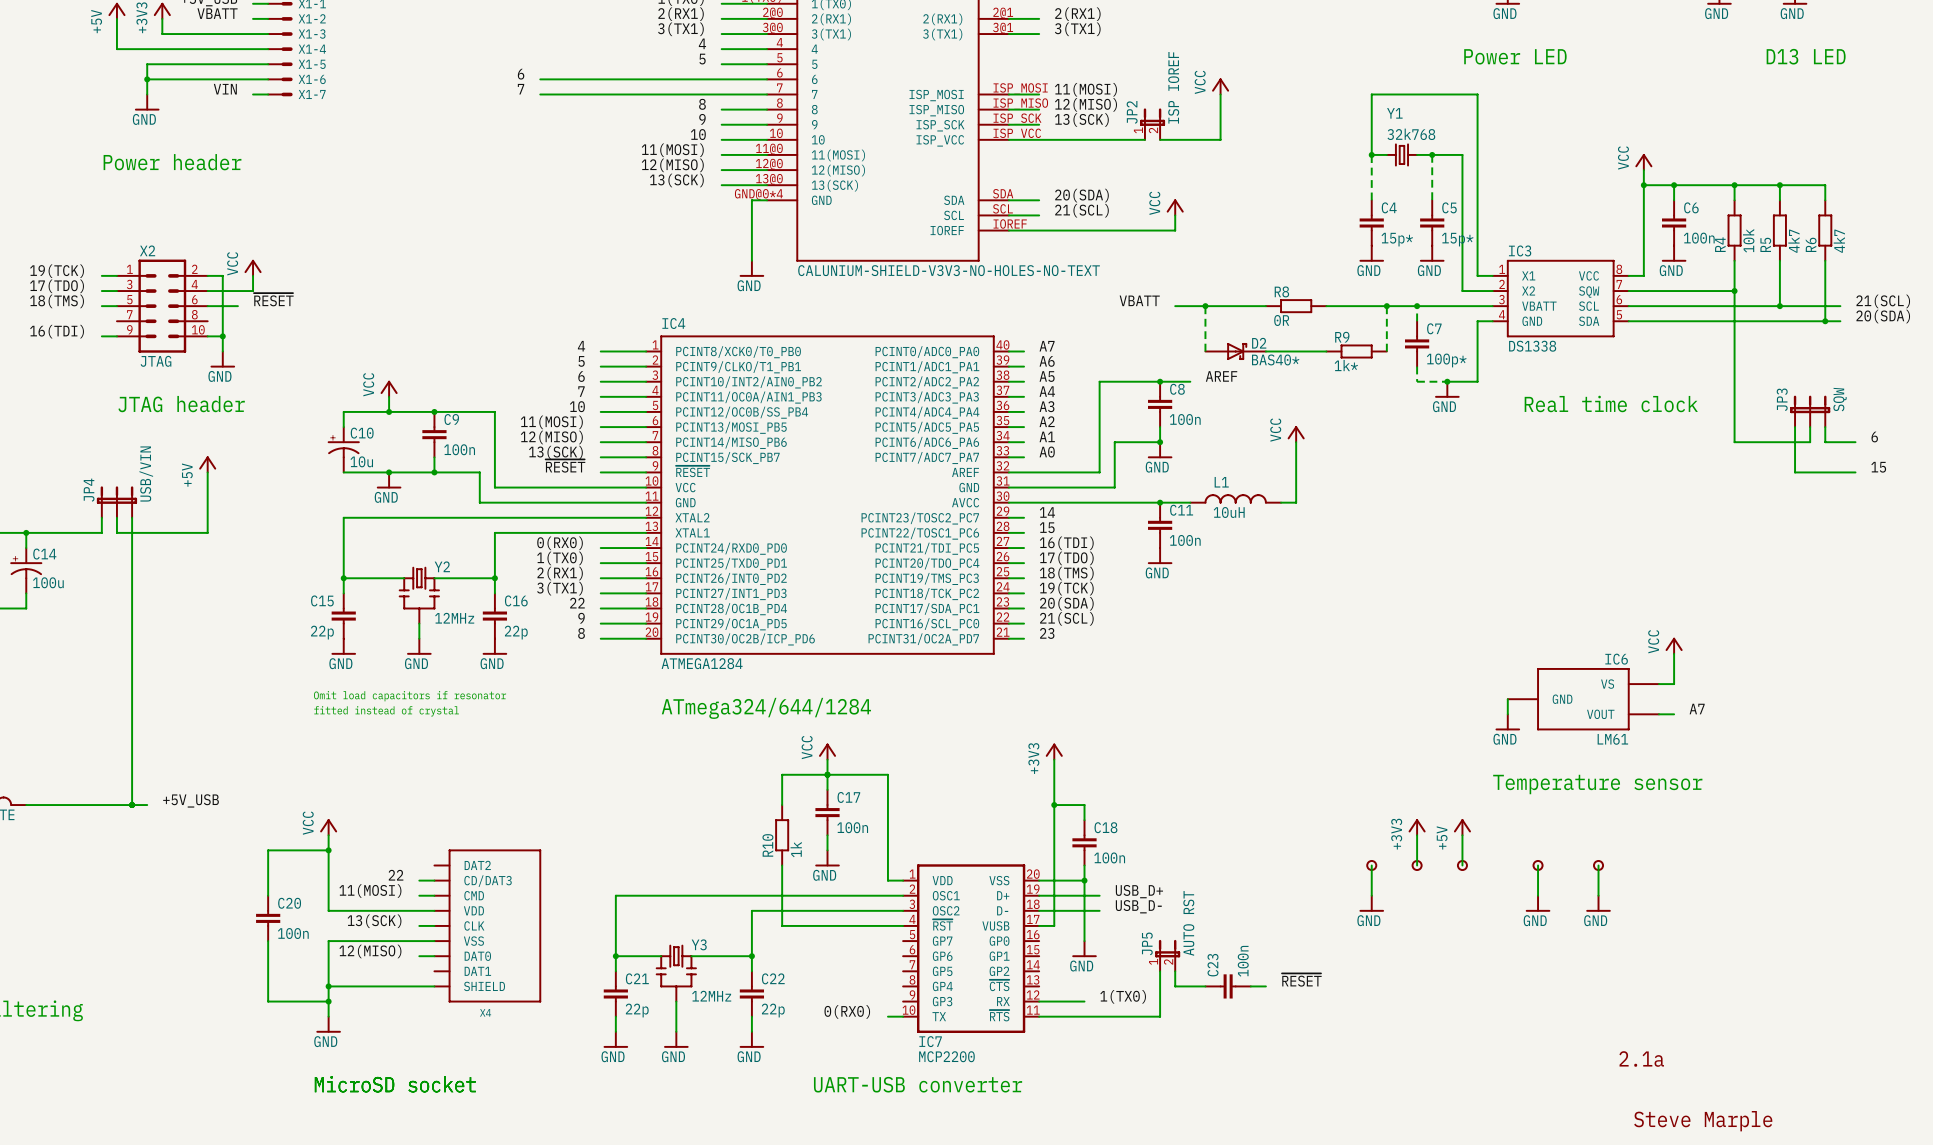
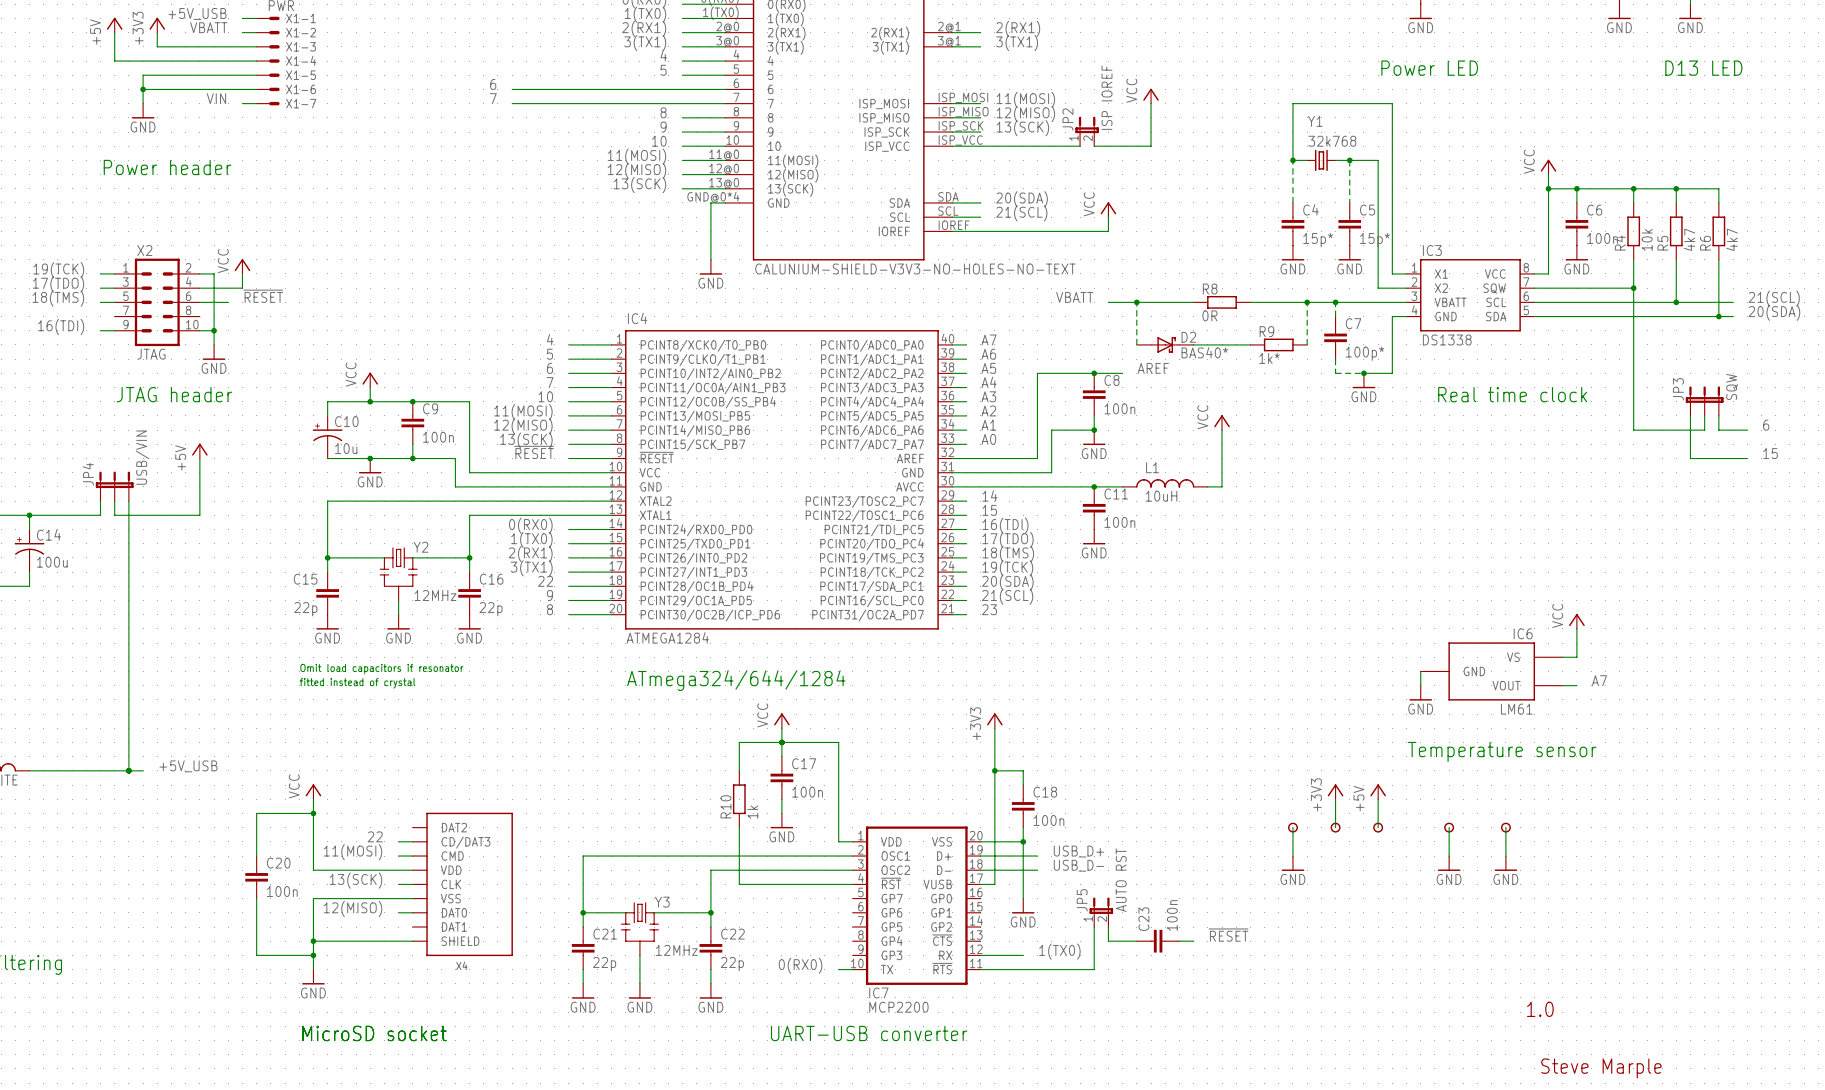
text: 2.1a (1641, 1059) -> 1.0 (1540, 1009)

